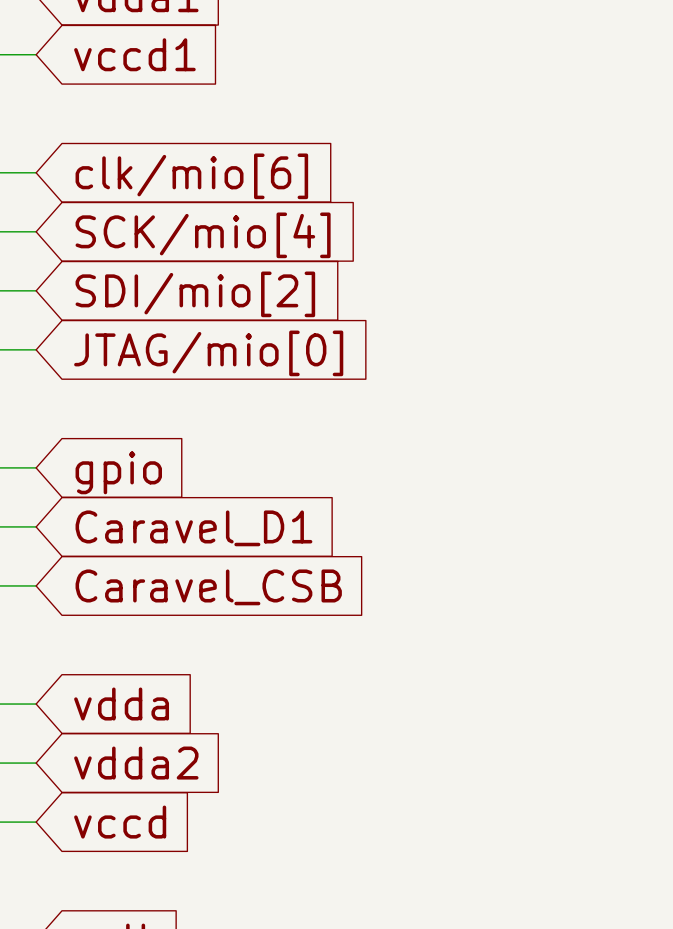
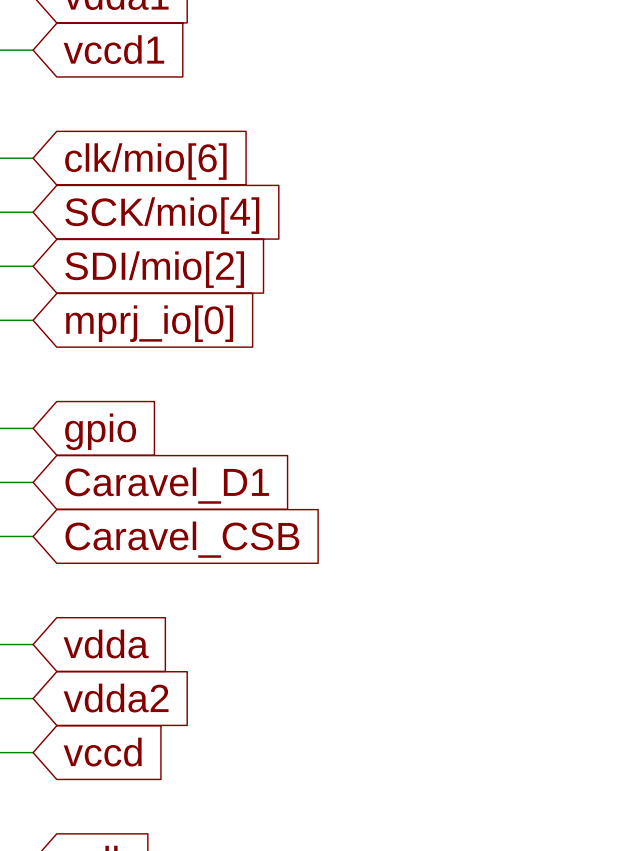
global label: JTAG/mio[0] (208, 353) -> mprj_io[0] (149, 323)

